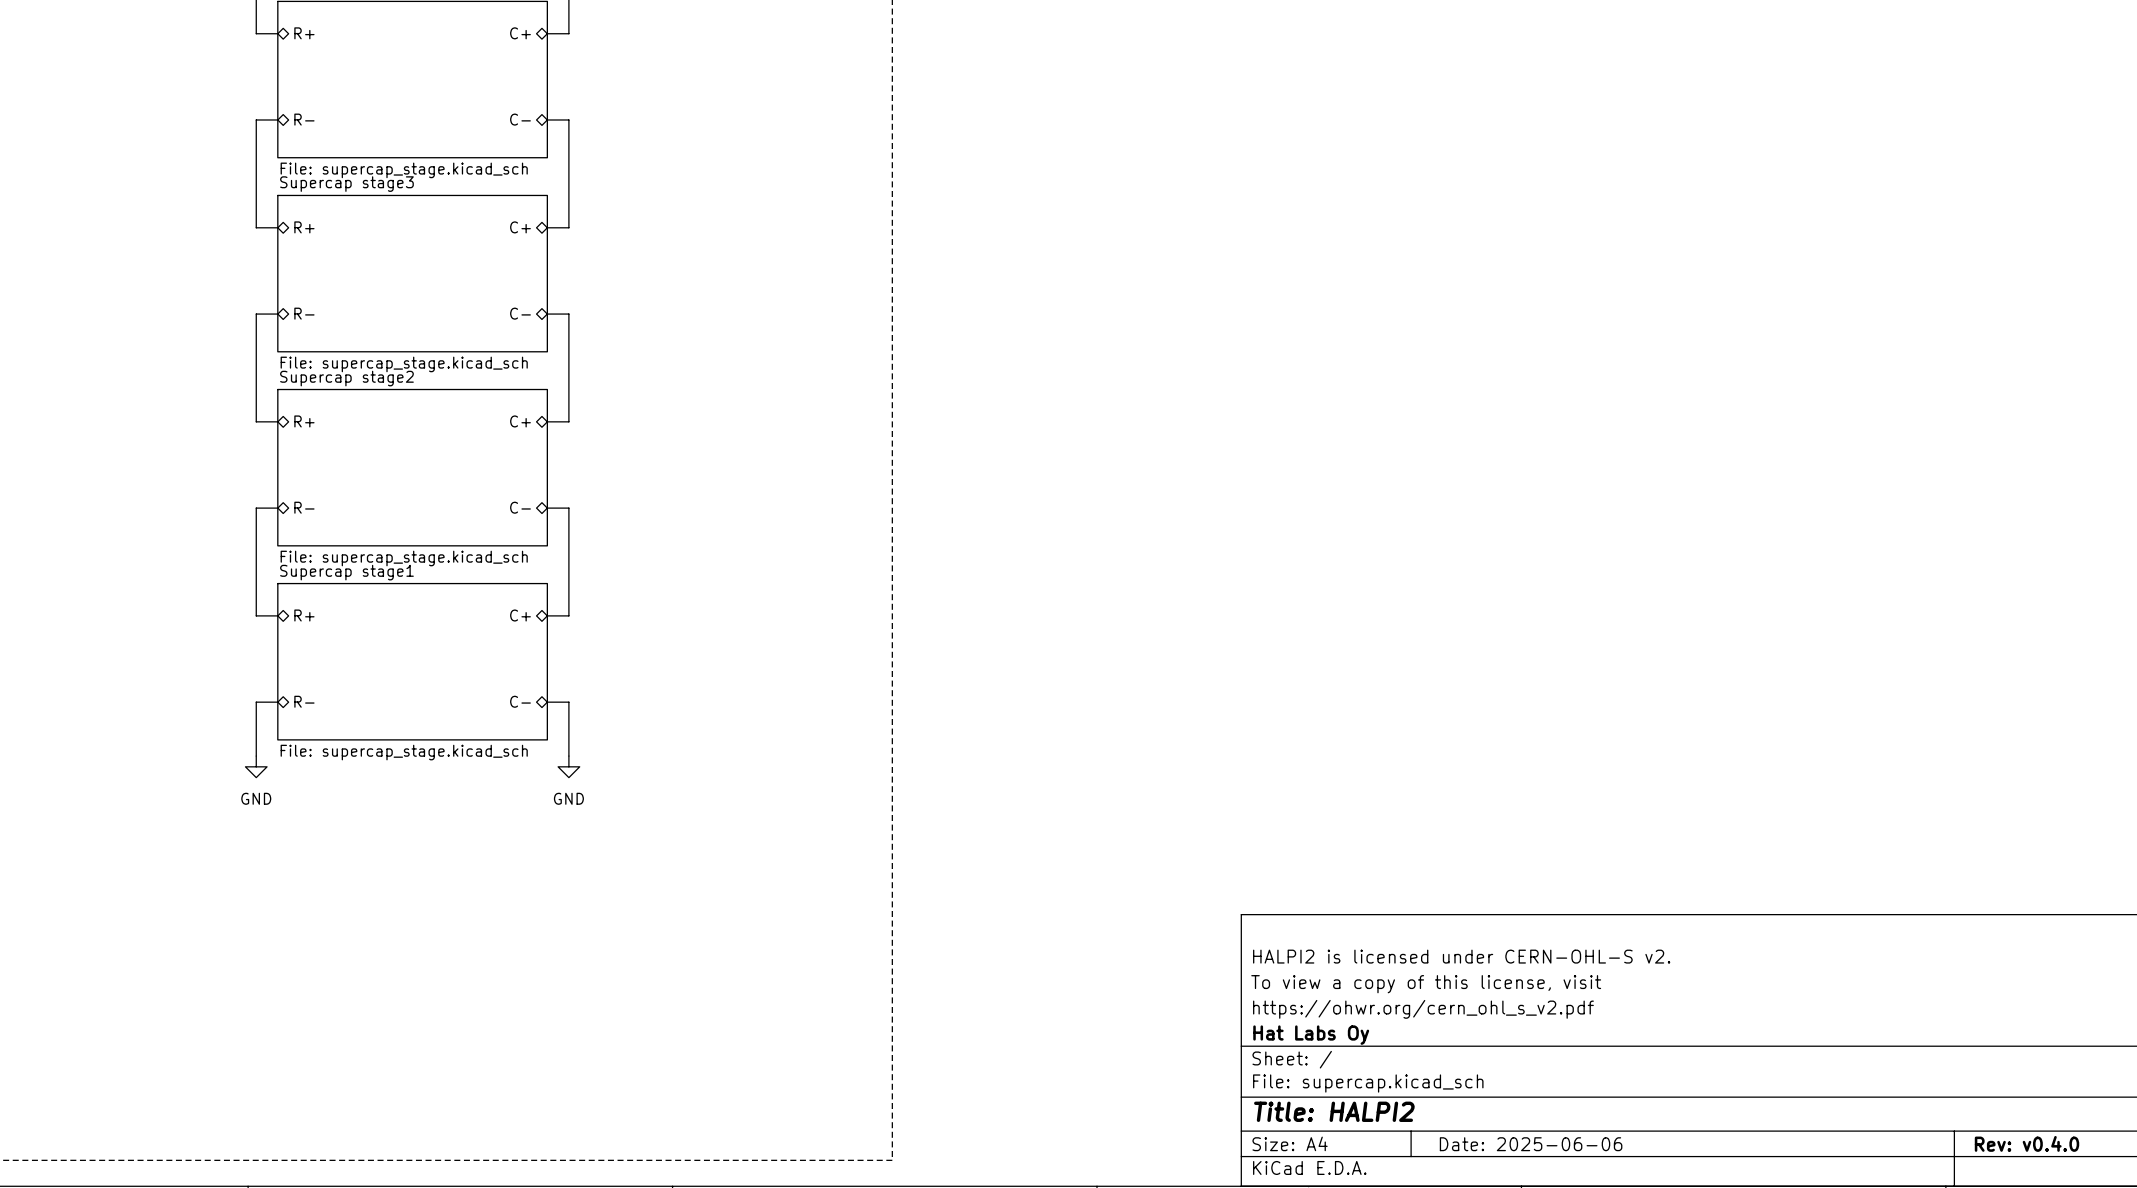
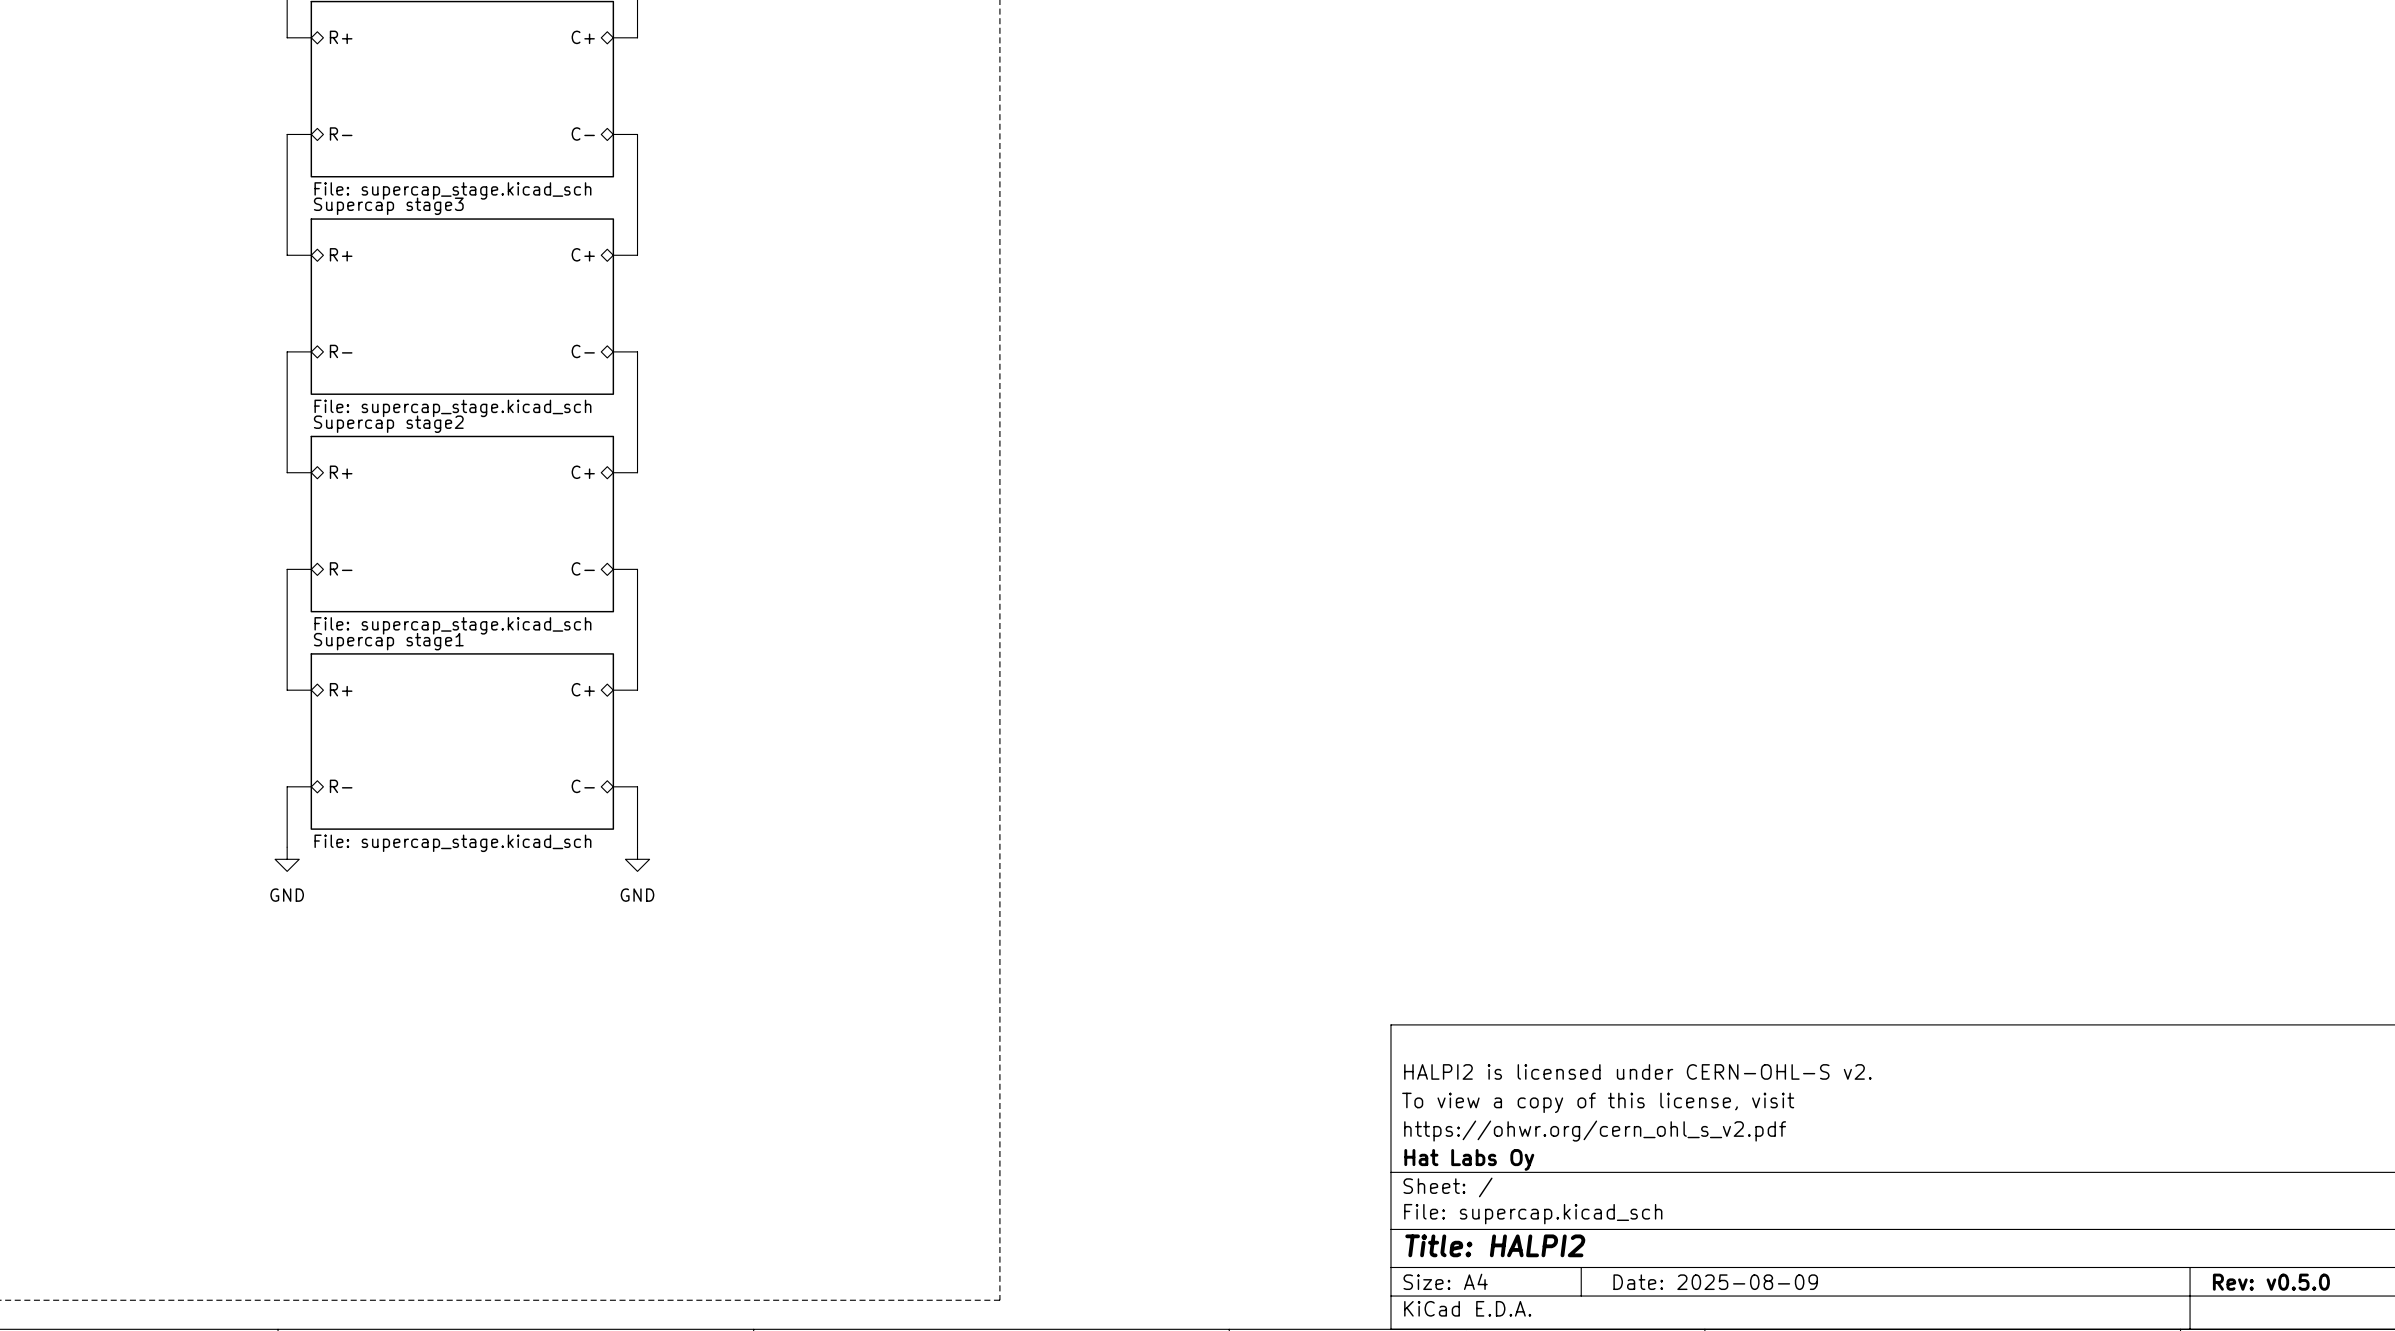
title block: Rev: v0.4.0 (2026, 1143) -> Rev: v0.5.0 (2271, 1282)
title block: Date: 2025-06-06 (1531, 1144) -> Date: 2025-08-09 (1715, 1282)

